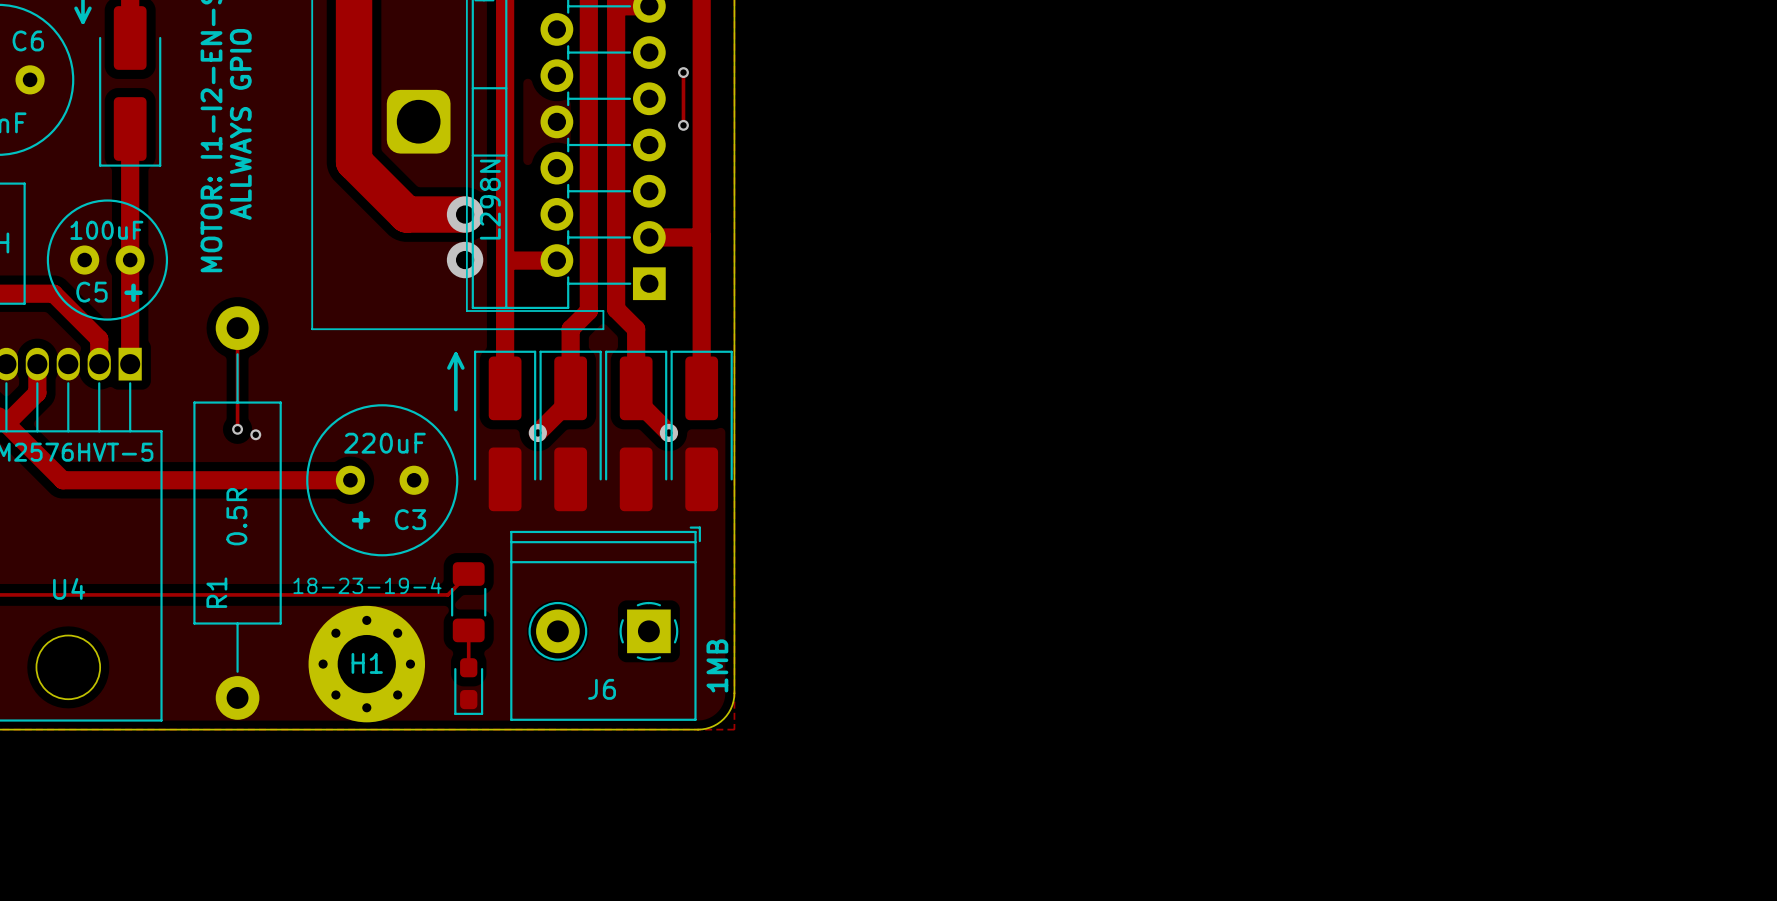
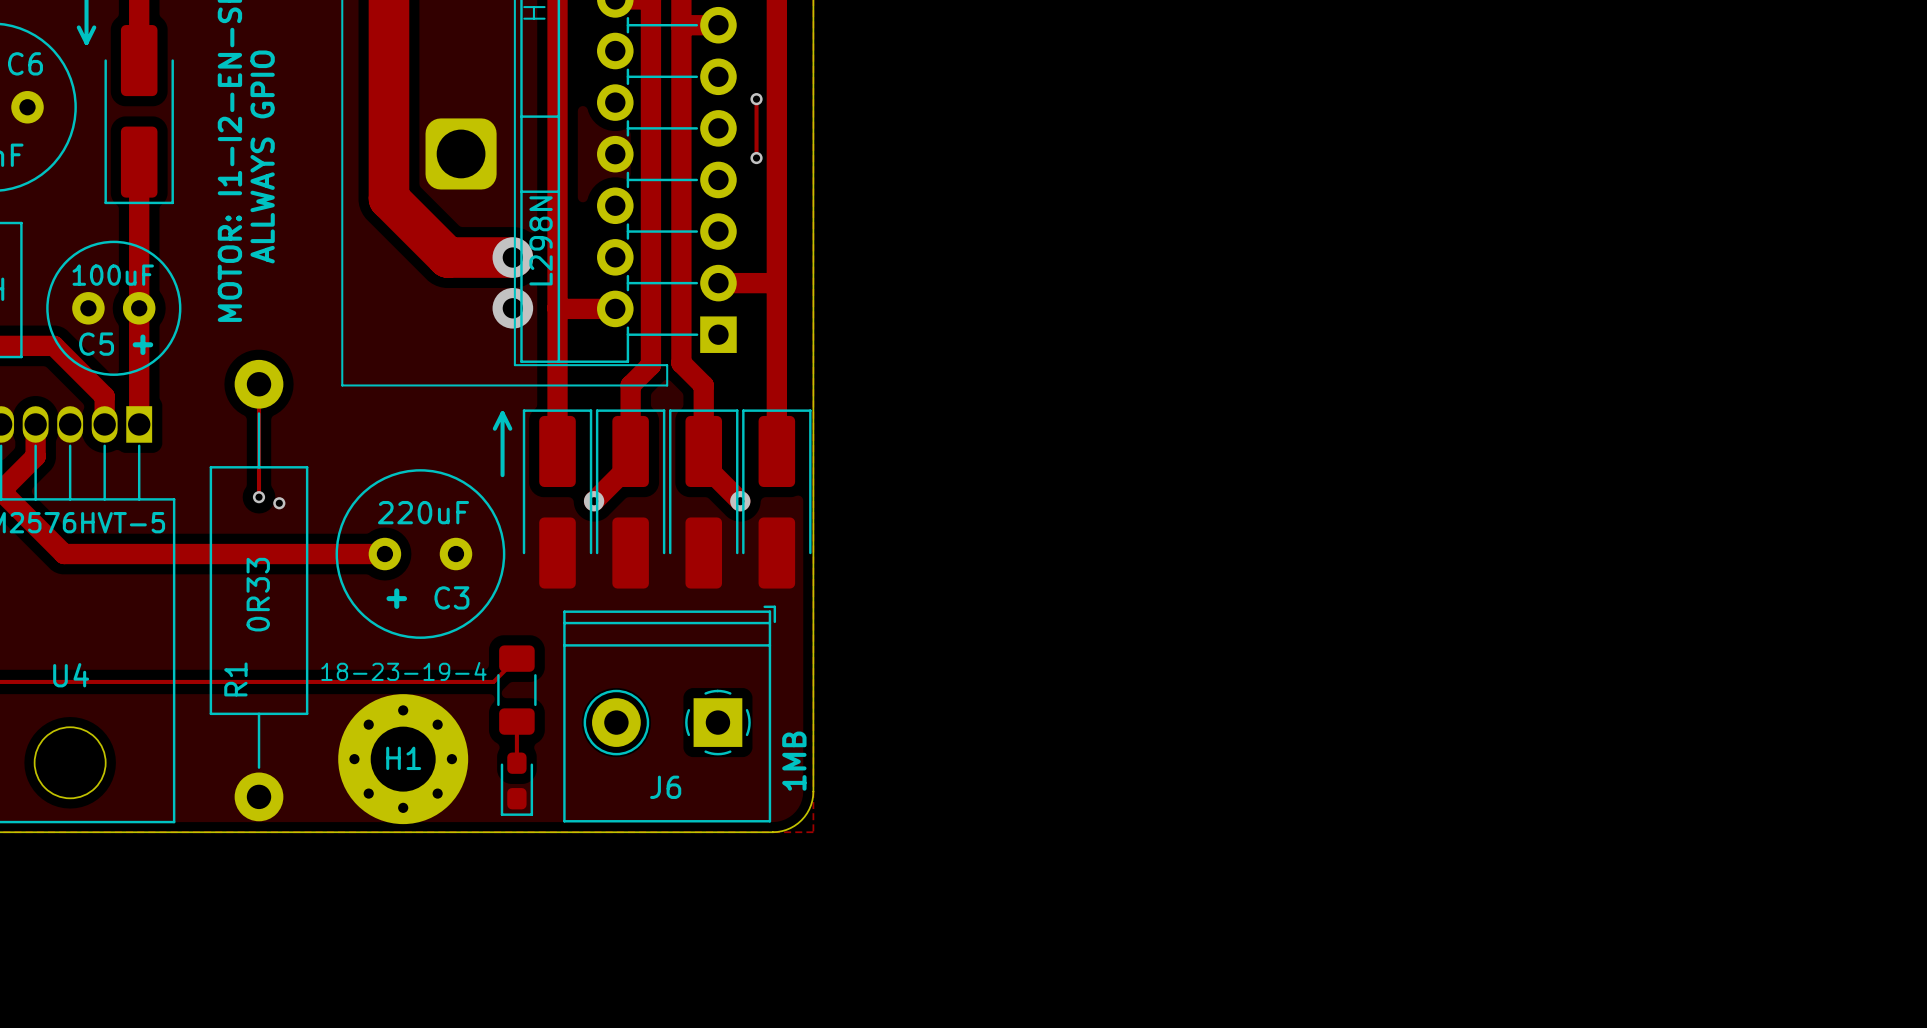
R1 value: 0.5R (236, 516) -> 0R33 (258, 594)

